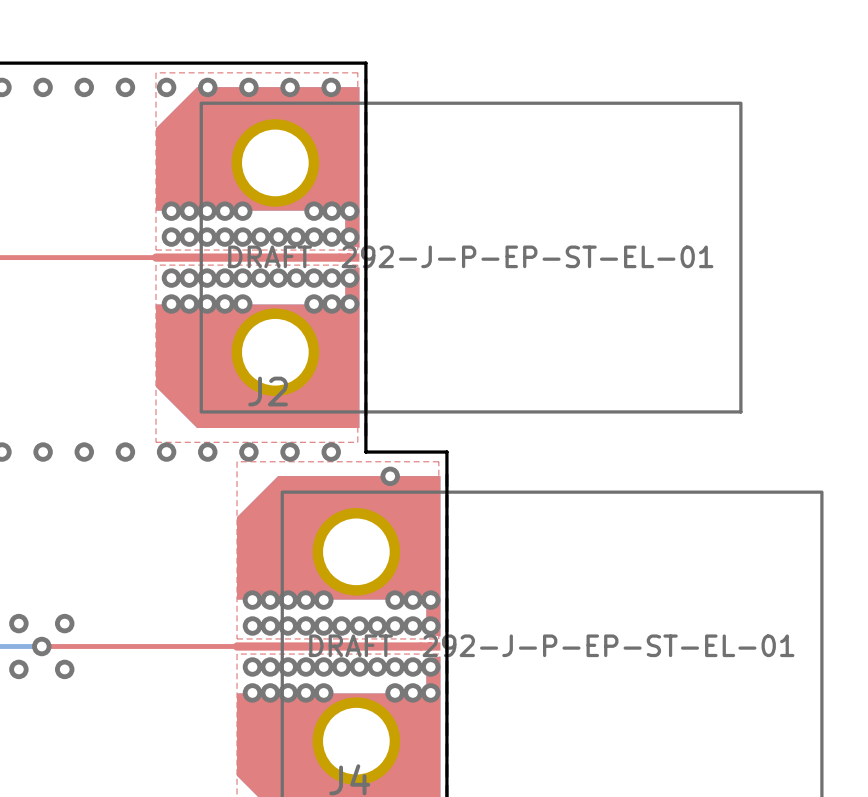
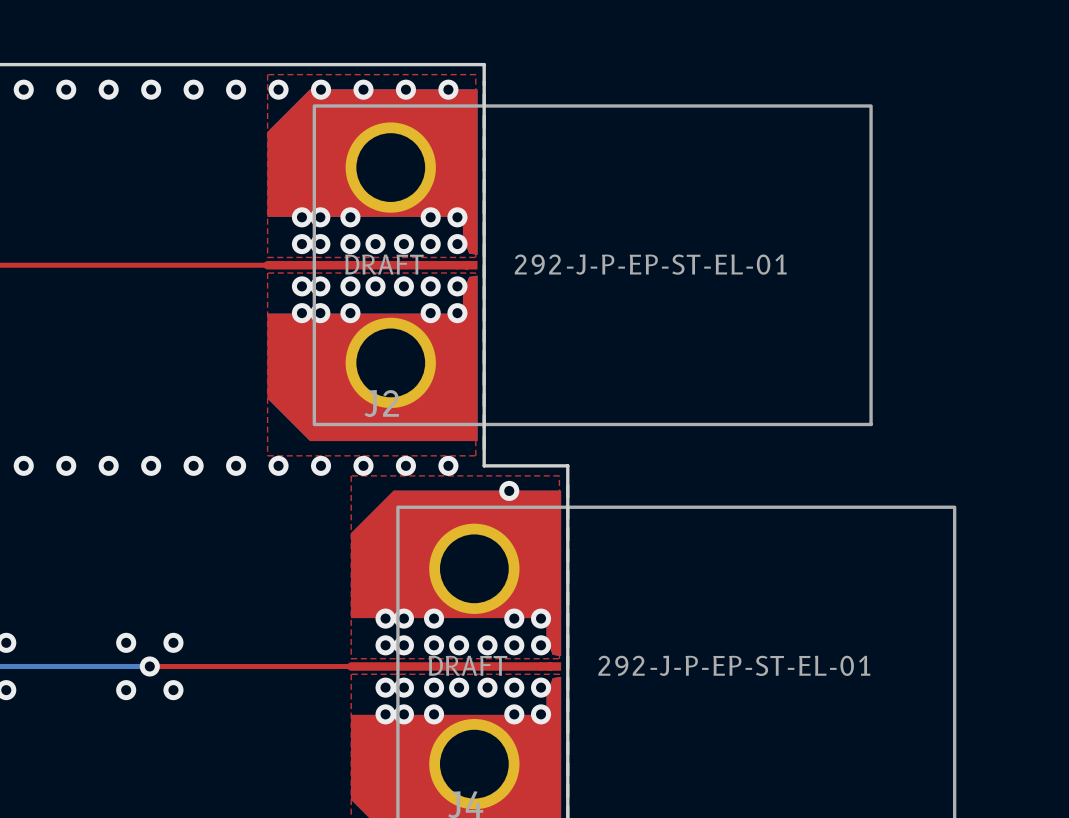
via: (171, 211) -> none
via: (224, 211) -> none
via: none -> (350, 217)
via: (242, 211) -> none
via: (331, 211) -> none
via: none -> (457, 217)
via: (349, 211) -> none
via: (171, 237) -> none
via: (224, 237) -> none
via: none -> (350, 244)
via: (242, 237) -> none
via: (278, 237) -> none
via: none -> (403, 244)
via: (296, 237) -> none
via: (331, 237) -> none
via: none -> (457, 244)
via: (349, 237) -> none
via: (171, 278) -> none
via: (224, 278) -> none
via: none -> (350, 286)
via: (242, 278) -> none
via: (278, 278) -> none
via: none -> (403, 286)
via: (296, 278) -> none
via: (331, 278) -> none
via: none -> (457, 286)
via: (349, 278) -> none
via: (171, 304) -> none
via: (224, 304) -> none
via: none -> (350, 313)
via: (242, 304) -> none
via: (331, 304) -> none
via: none -> (457, 313)
via: (349, 304) -> none
via: (252, 600) -> none
via: (305, 600) -> none
via: none -> (434, 618)
via: (323, 600) -> none
via: (412, 600) -> none
via: none -> (541, 618)
via: (430, 600) -> none
via: (252, 626) -> none
via: (305, 626) -> none
via: none -> (434, 645)
via: (323, 626) -> none
via: (359, 626) -> none
via: none -> (487, 645)
via: (377, 626) -> none
via: (412, 626) -> none
via: none -> (541, 645)
via: (430, 626) -> none
via: (252, 667) -> none
via: (305, 667) -> none
via: none -> (434, 687)
via: (323, 667) -> none
via: (359, 667) -> none
via: none -> (487, 687)
via: (377, 667) -> none
via: (412, 667) -> none
via: none -> (541, 687)
via: (430, 667) -> none
via: (252, 692) -> none
via: (305, 692) -> none
via: none -> (434, 714)
via: (323, 692) -> none
via: (412, 692) -> none
via: none -> (541, 714)
via: (430, 692) -> none

